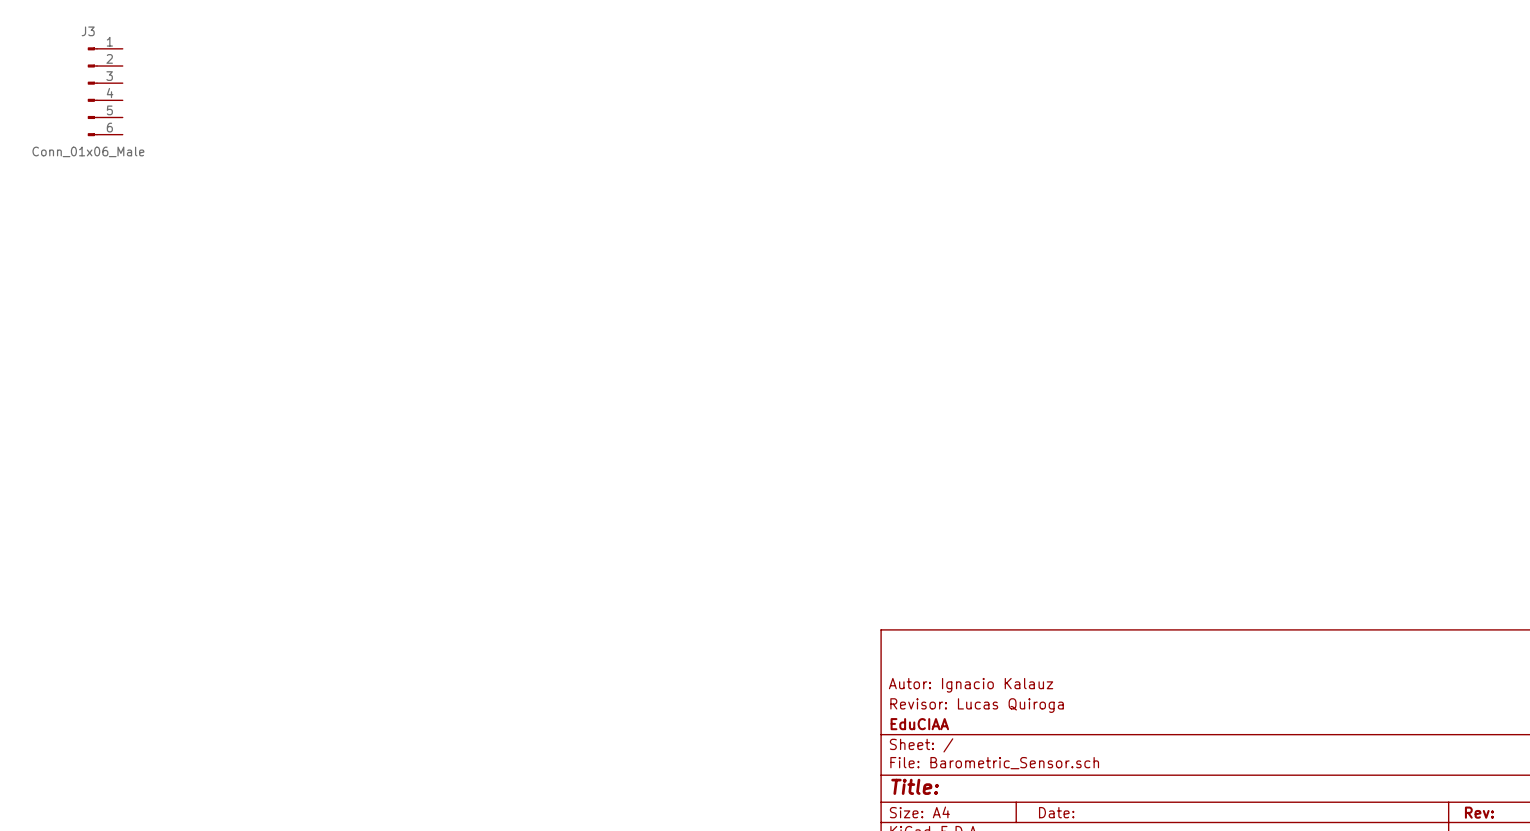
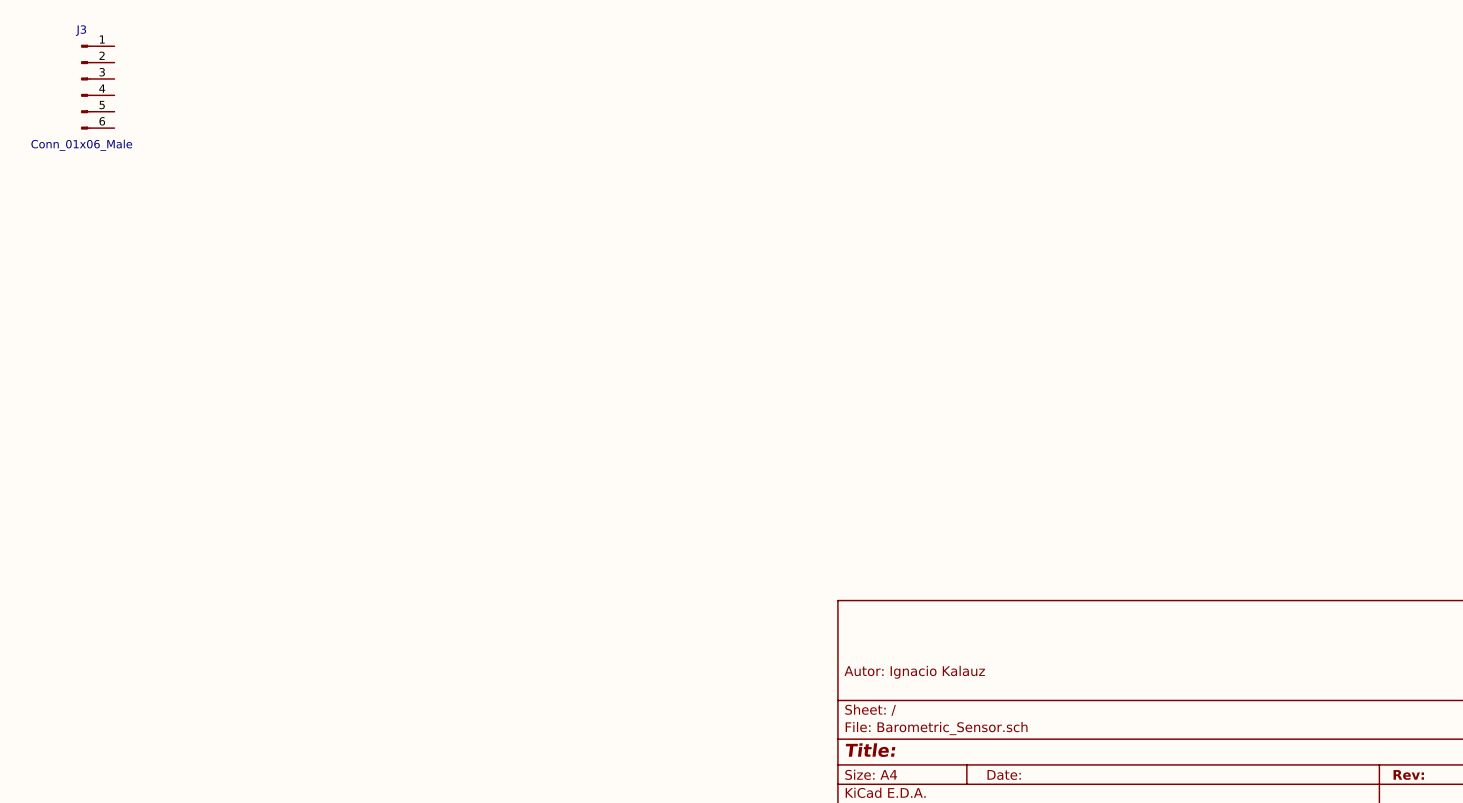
title block: Autor: Ignacio Kalauz (971, 685) -> none
title block: Revisor: Lucas Quiroga (977, 705) -> Autor: Ignacio Kalauz (914, 672)
title block: EduCIAA (919, 724) -> none

